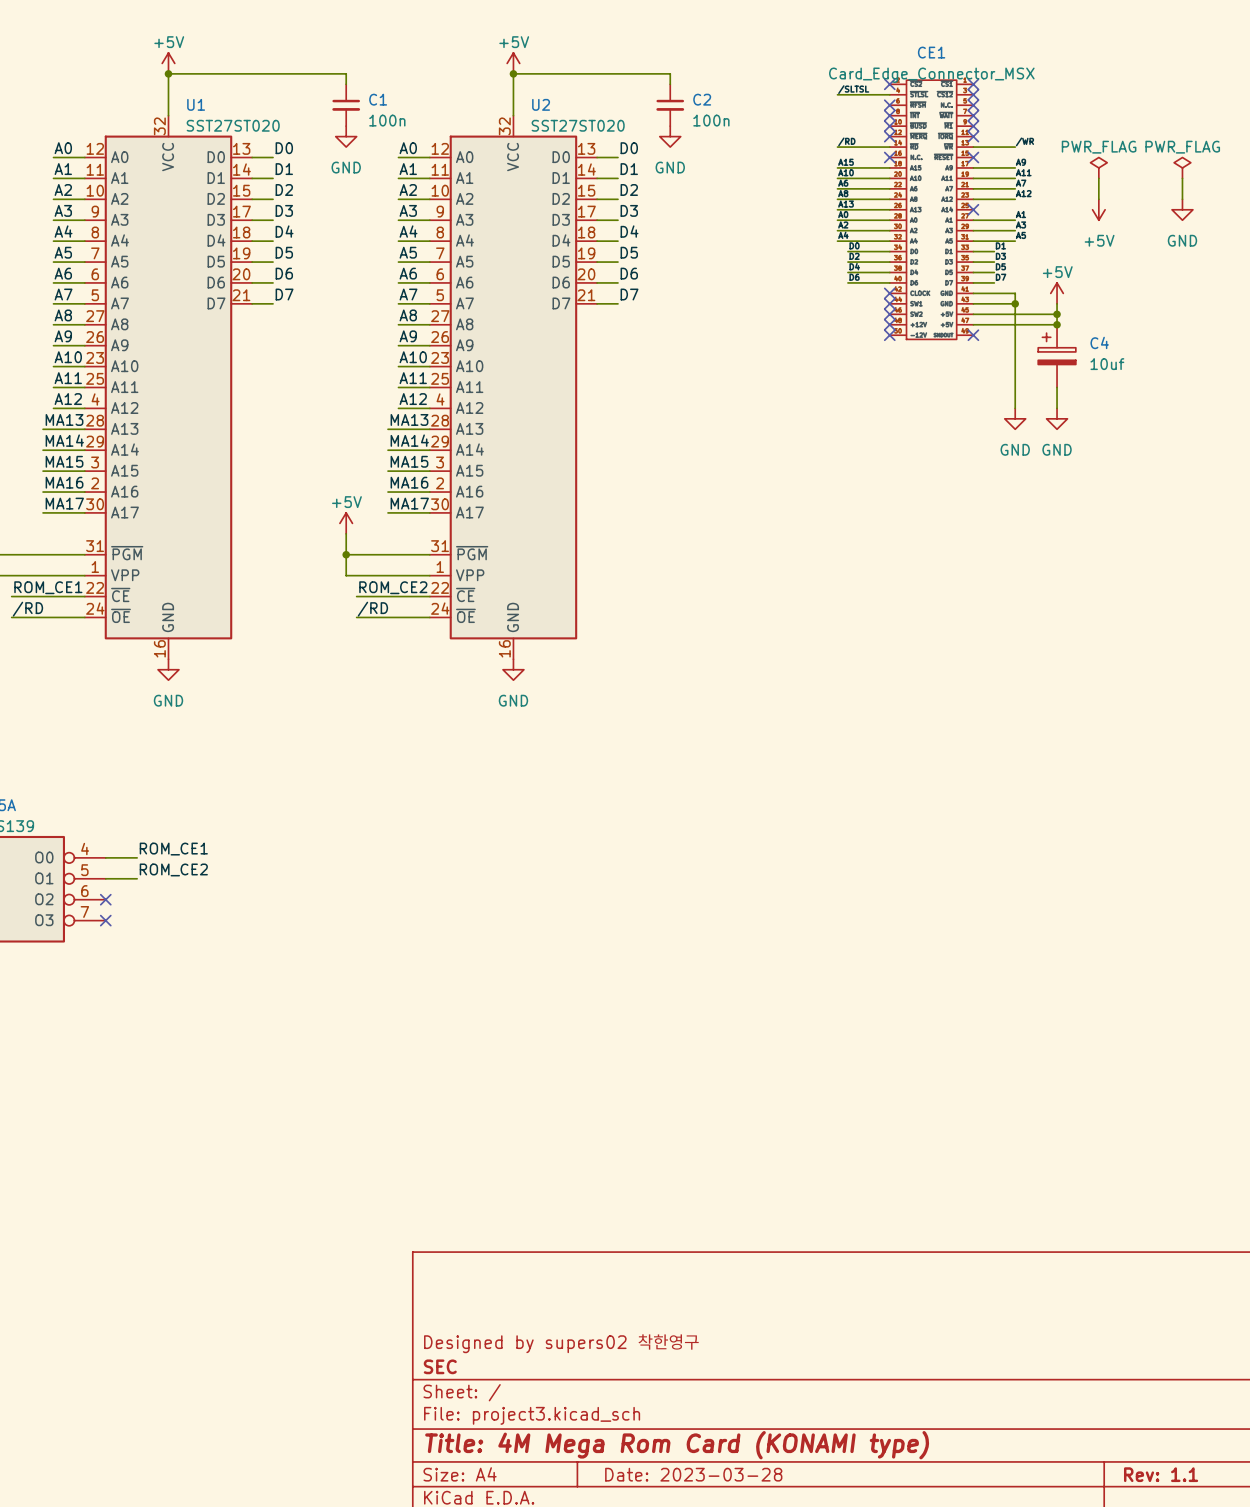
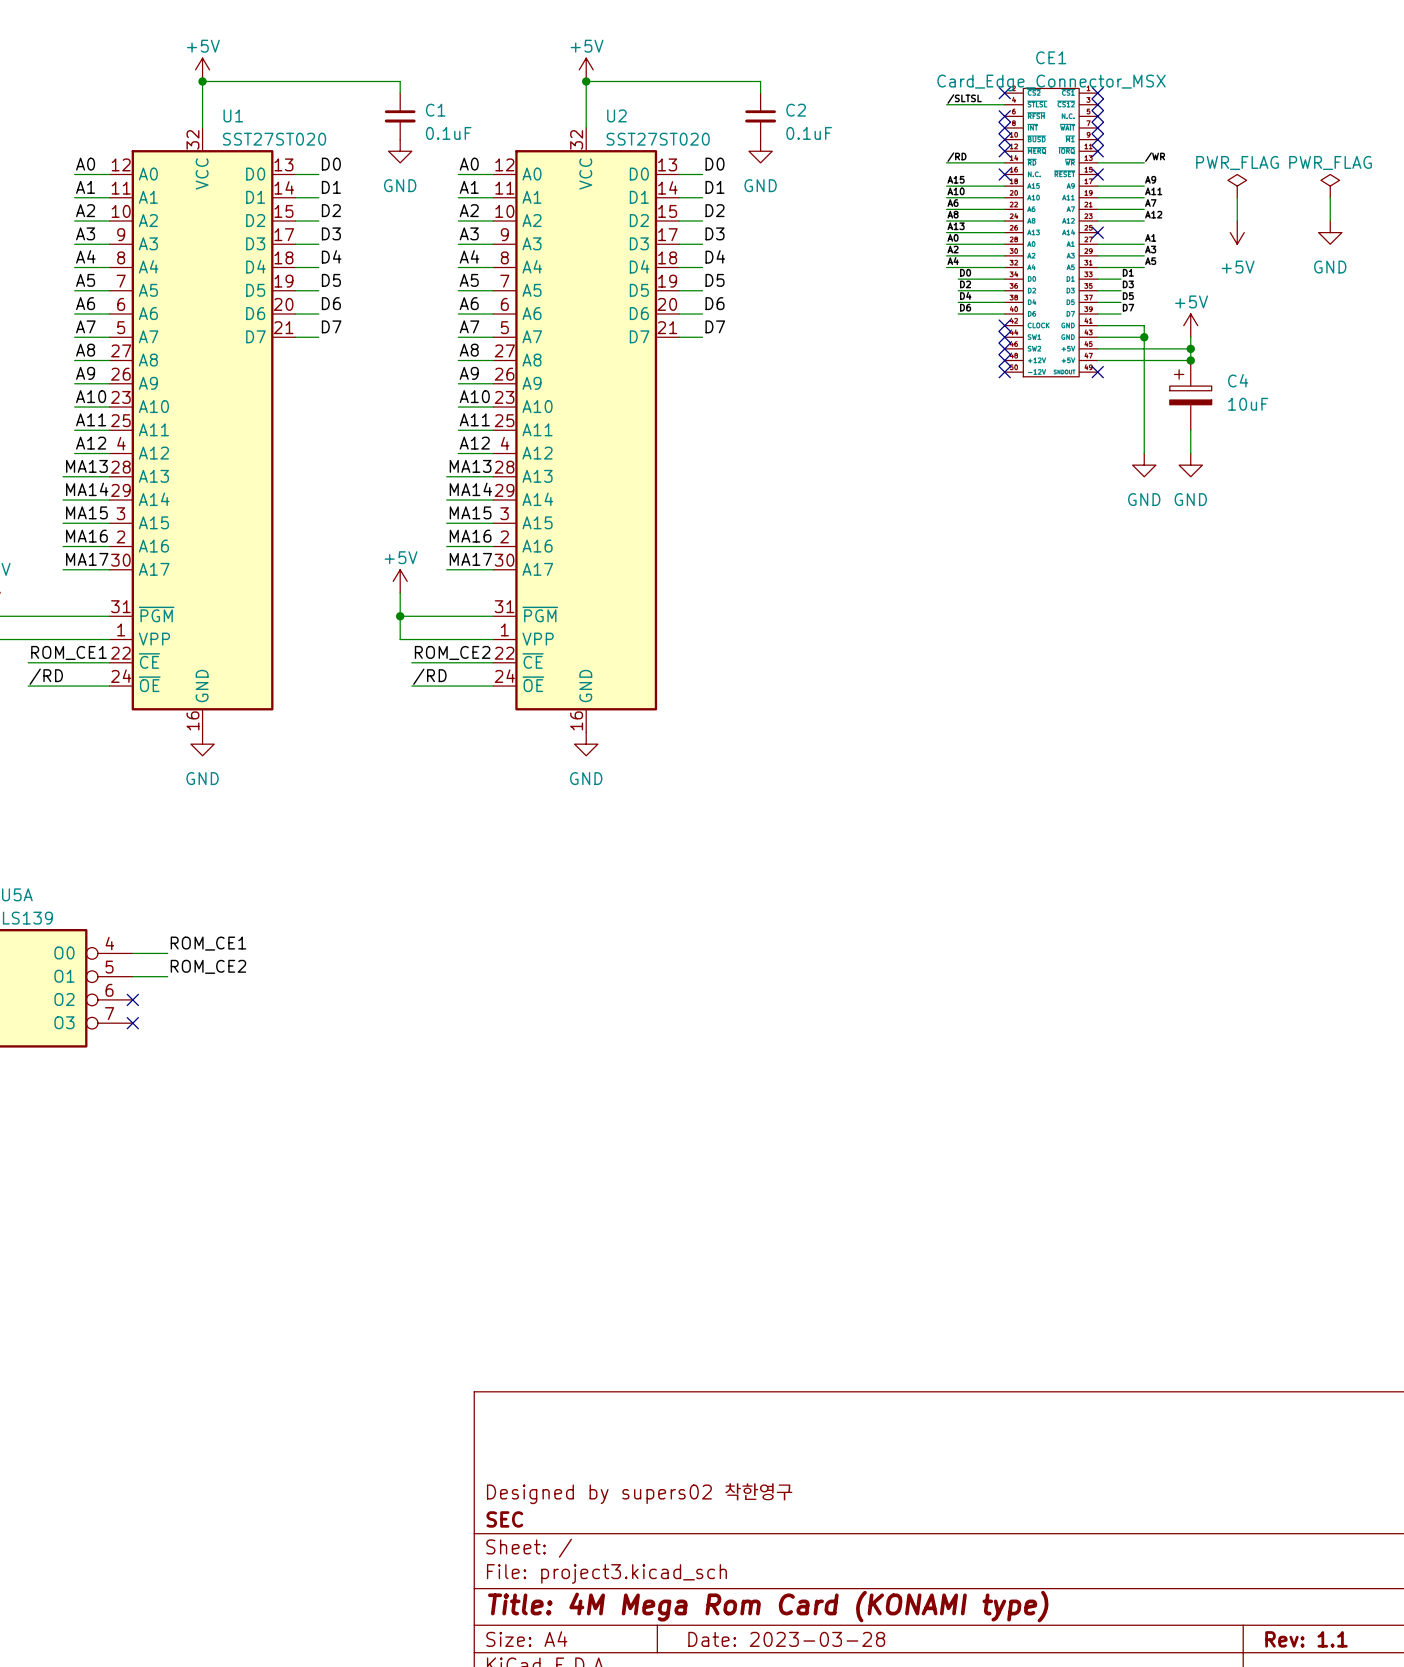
C1 value: 100n (387, 120) -> 0.1uF (448, 133)
C2 value: 100n (711, 120) -> 0.1uF (809, 133)
C4 value: 10uf (1107, 364) -> 10uF (1248, 404)

